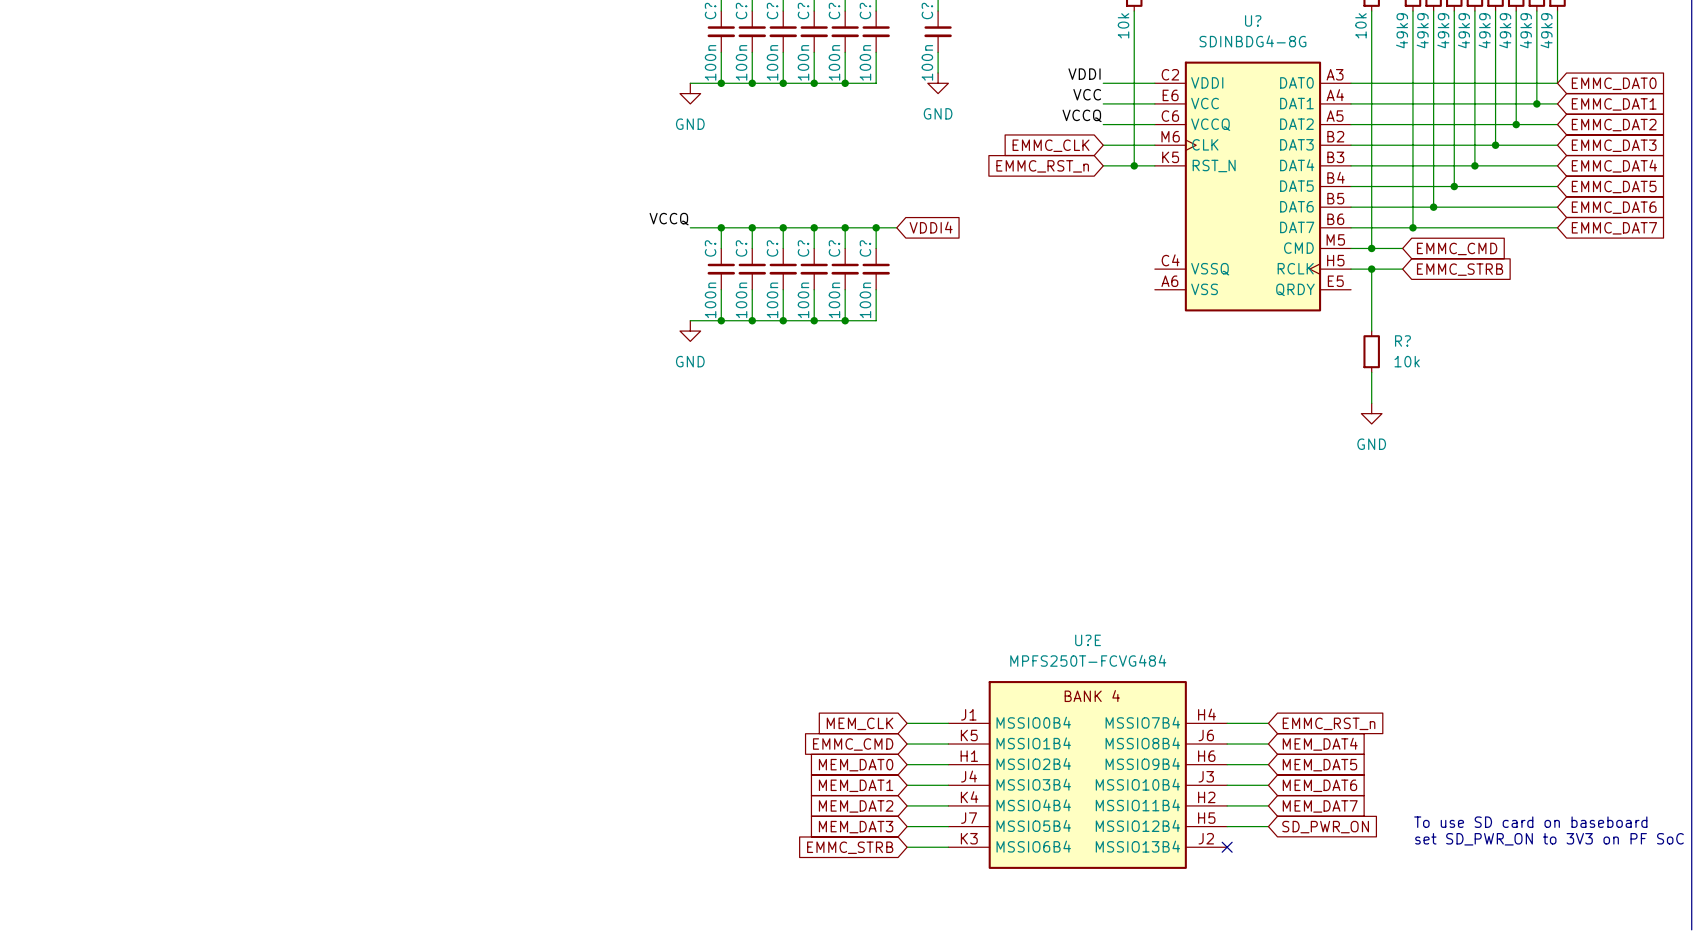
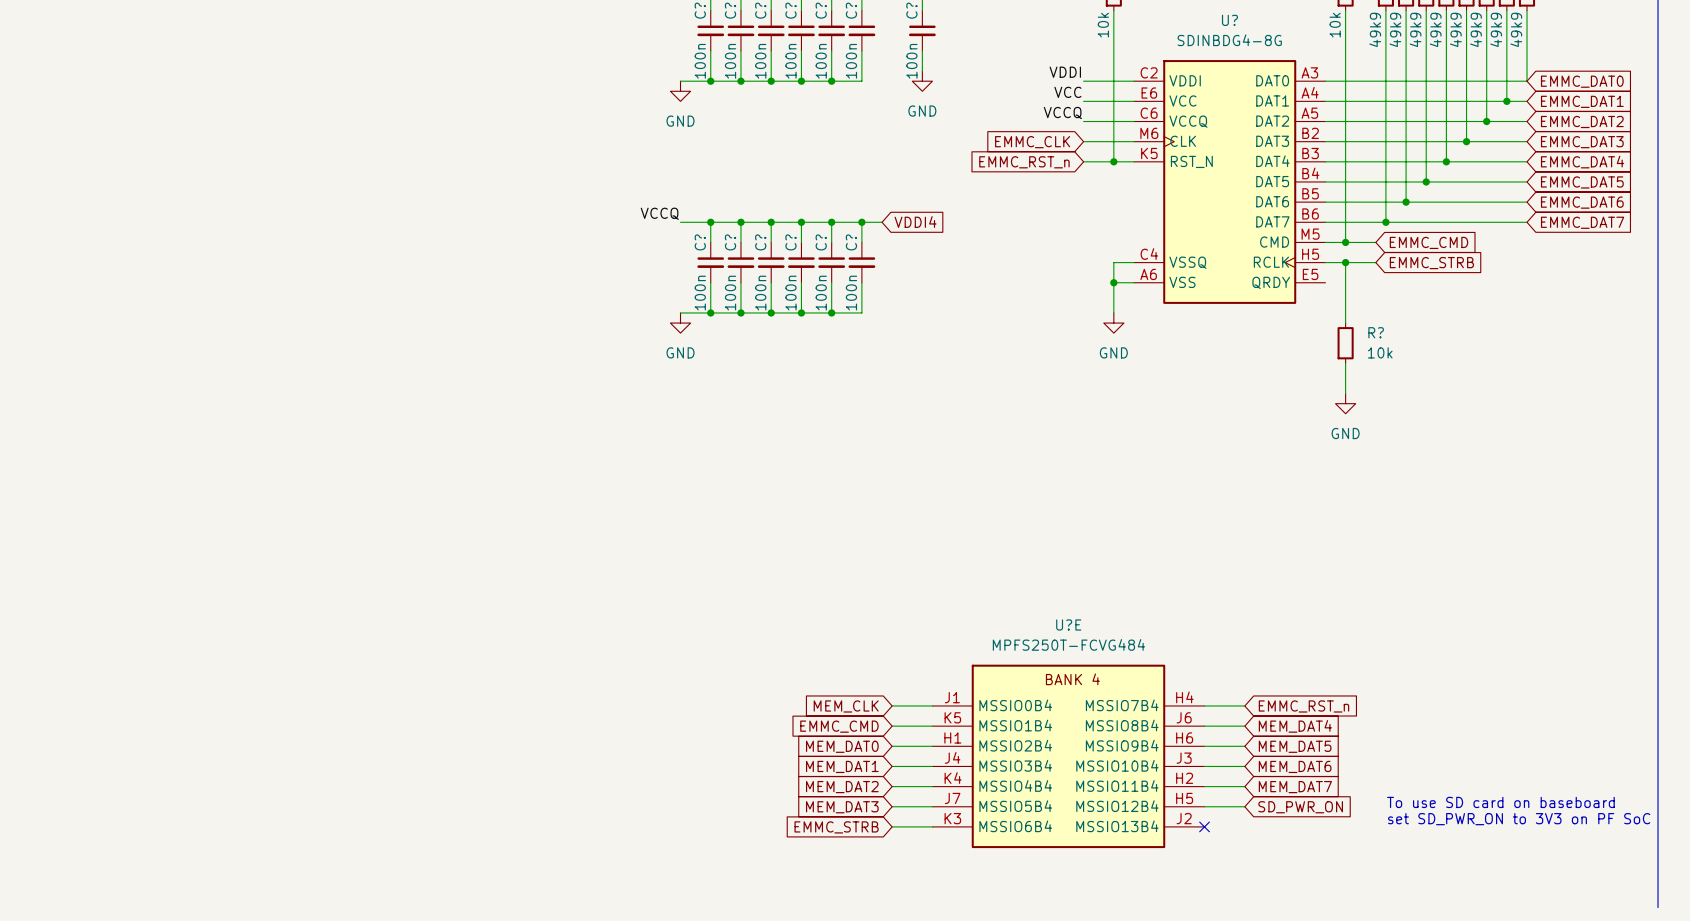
wire: none -> (1133, 262) (1113, 262) (1113, 312)
wire: none -> (1113, 282) (1133, 282)
junction: none -> (1113, 282)
power symbol: none -> GND (1113, 323)

